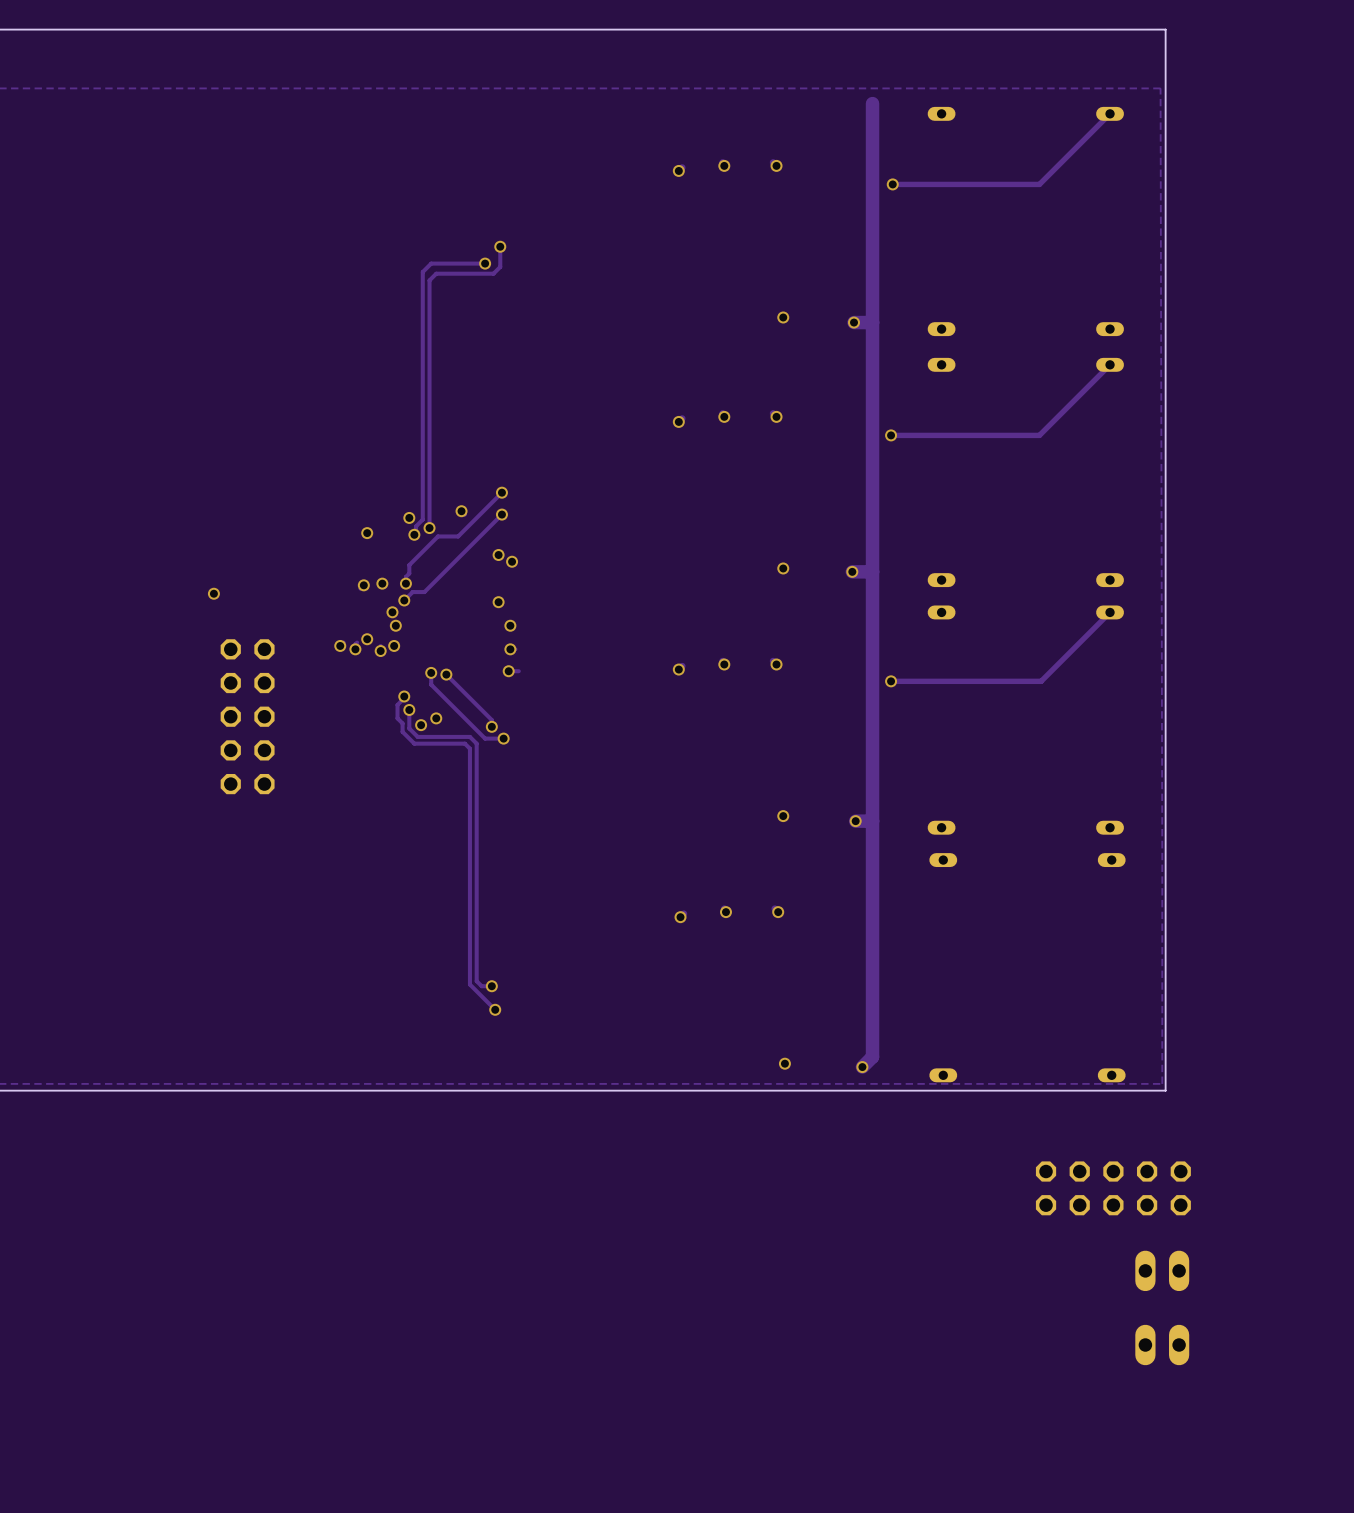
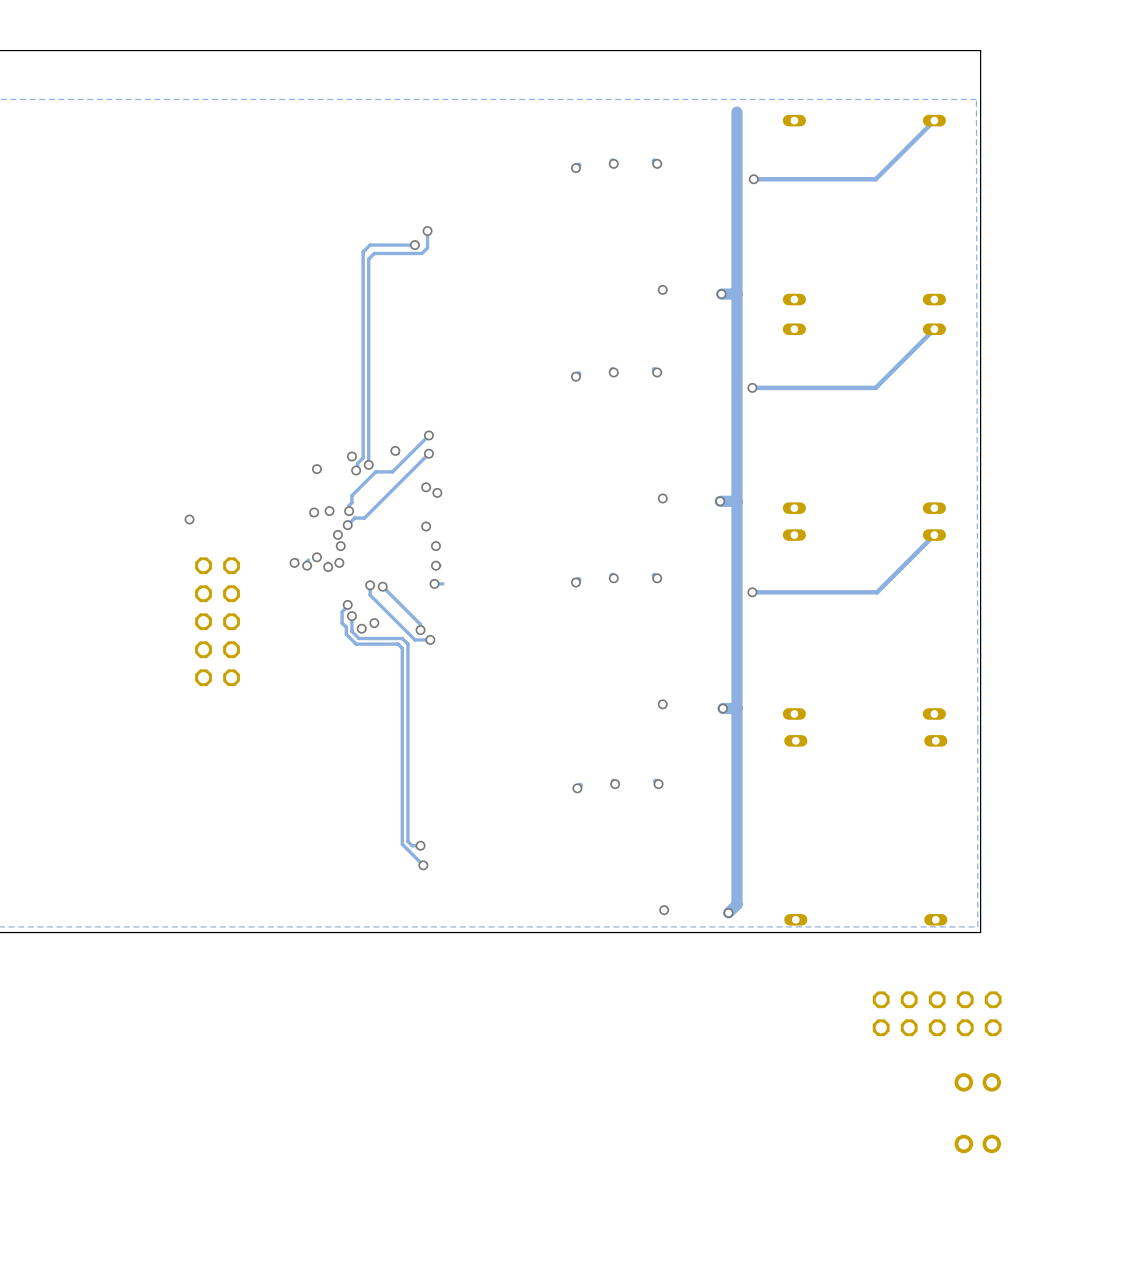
part footprint: [1135, 1250, 1190, 1292] -> [954, 1073, 1002, 1092]
part footprint: [1135, 1324, 1190, 1366] -> [954, 1134, 1002, 1154]

